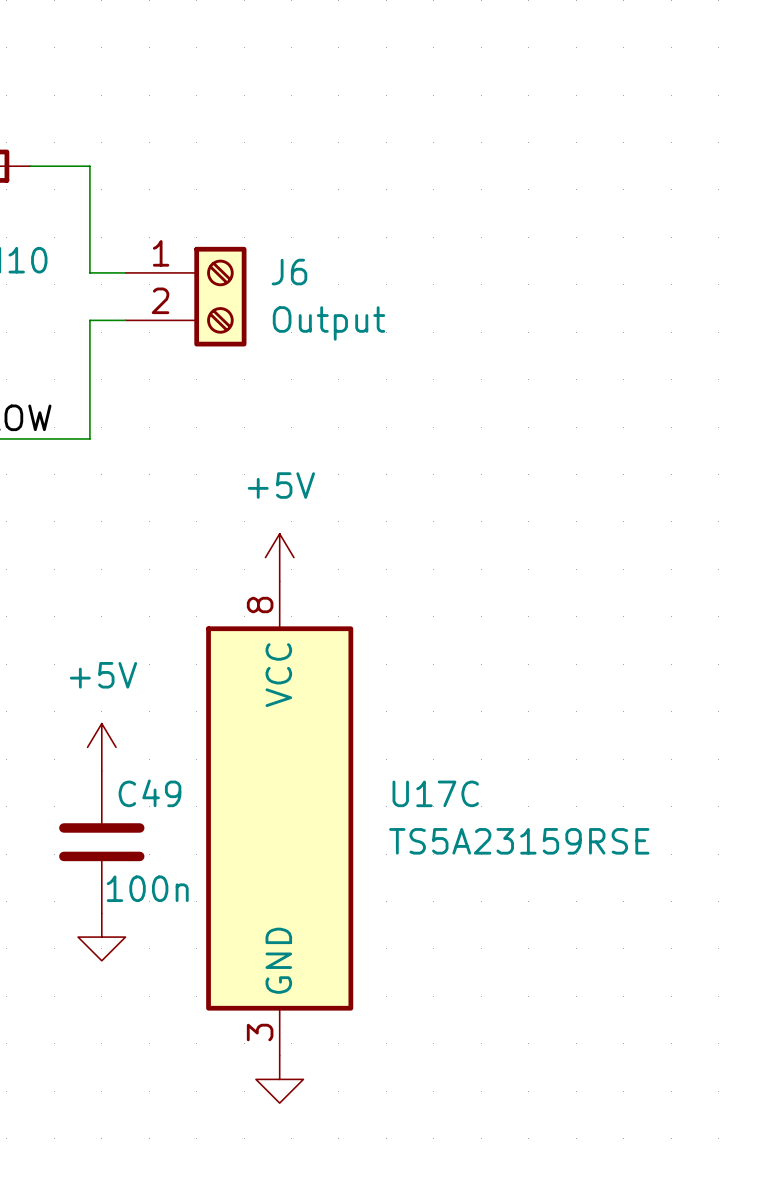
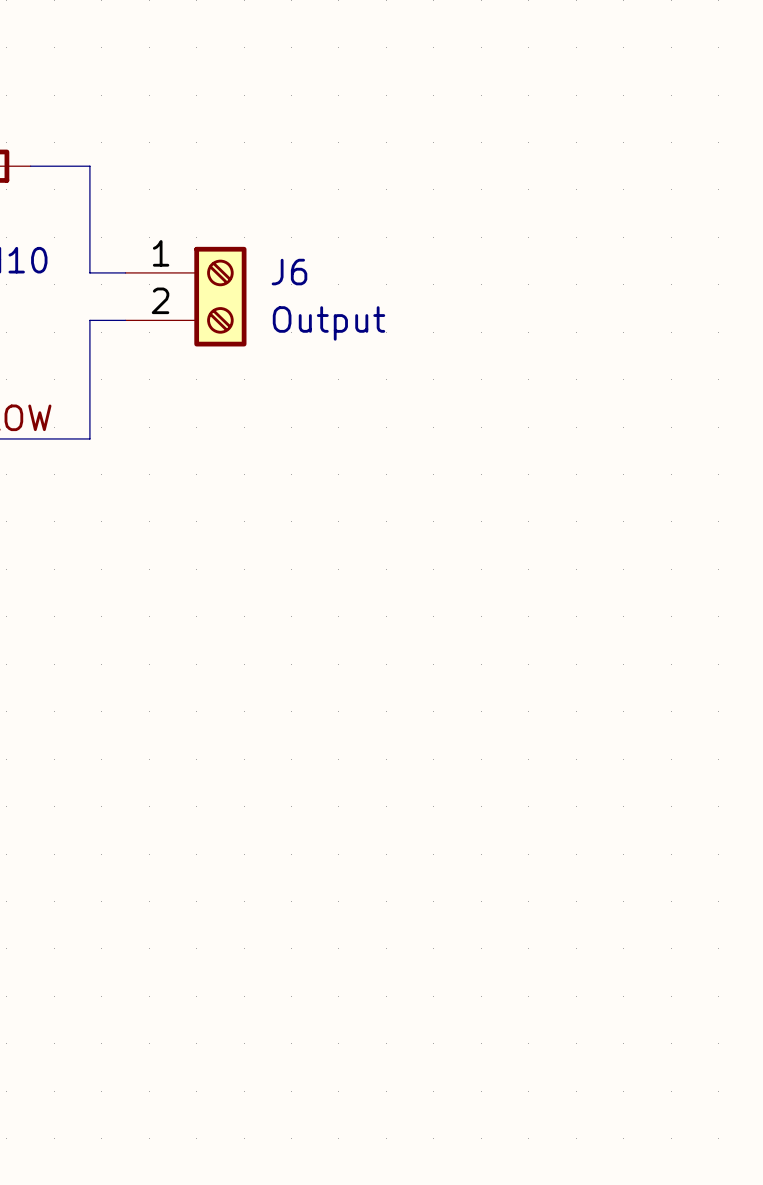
power symbol: +5V (279, 557) -> none
power symbol: +5V (101, 747) -> none
U17C: TS5A23159RSE (279, 818) -> none
C49: 100n (101, 842) -> none
power symbol: (101, 937) -> none
power symbol: (279, 1079) -> none

